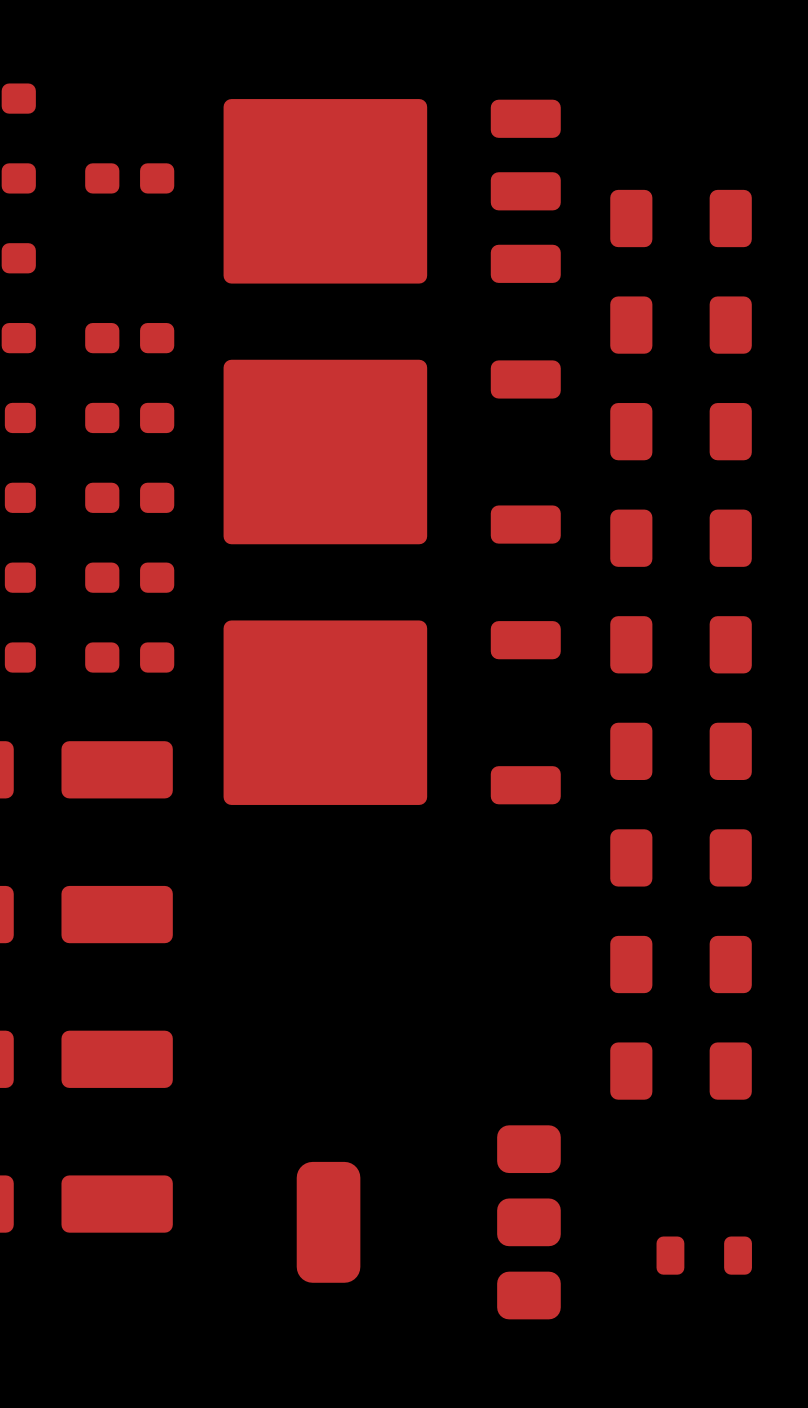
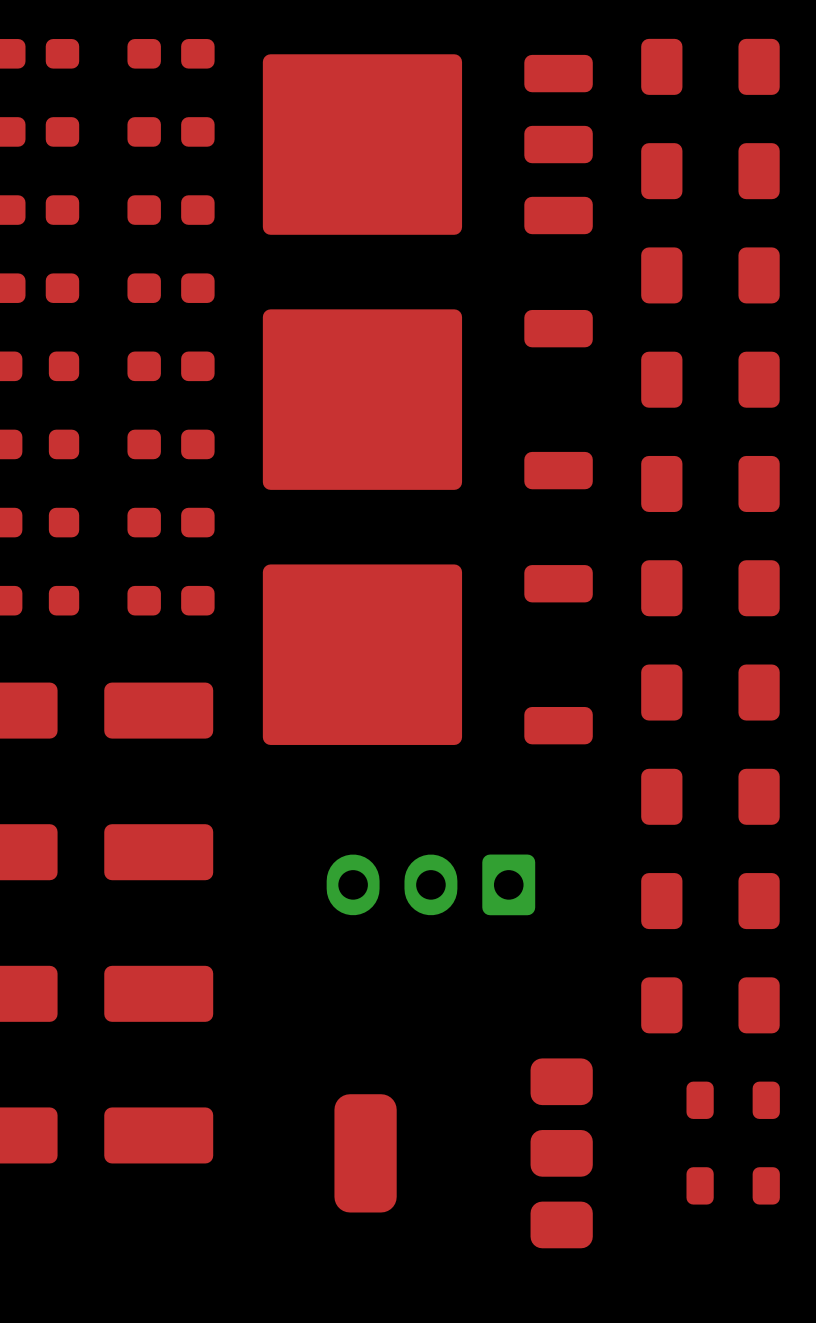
part: none -> (171, 53)
part: none -> (710, 66)
part: none -> (171, 210)
part: none -> (430, 884)
part: none -> (733, 1100)

